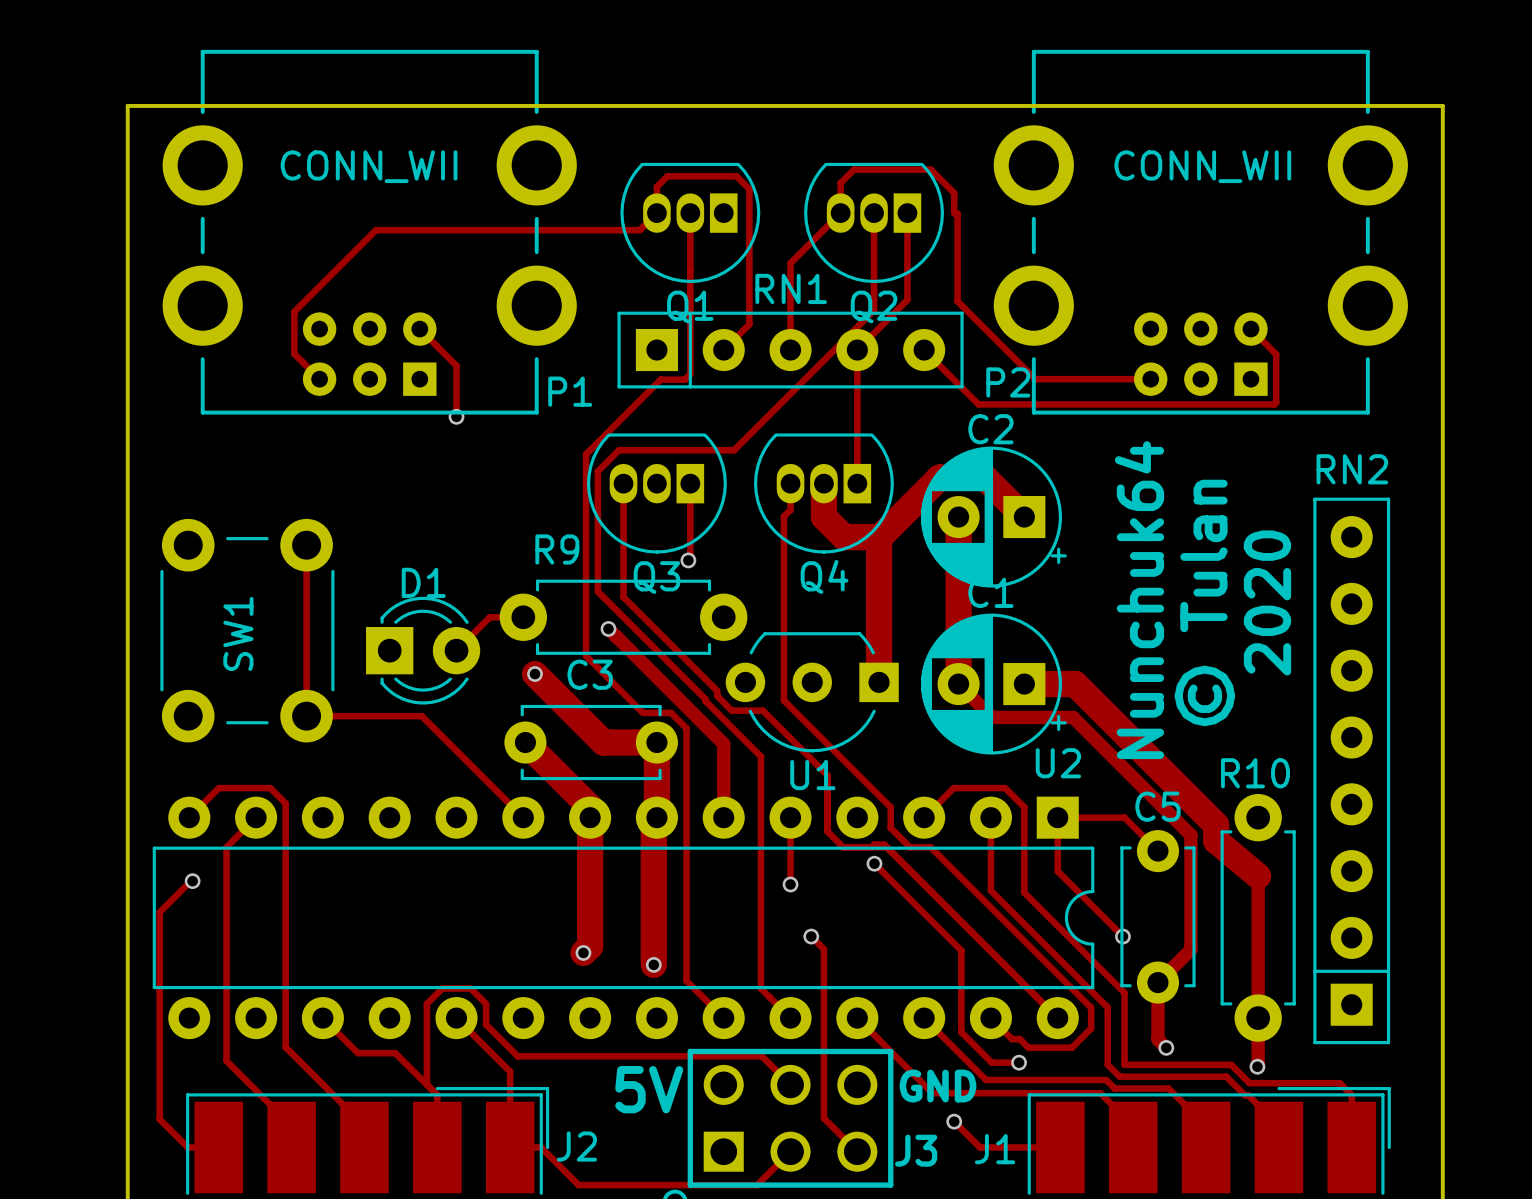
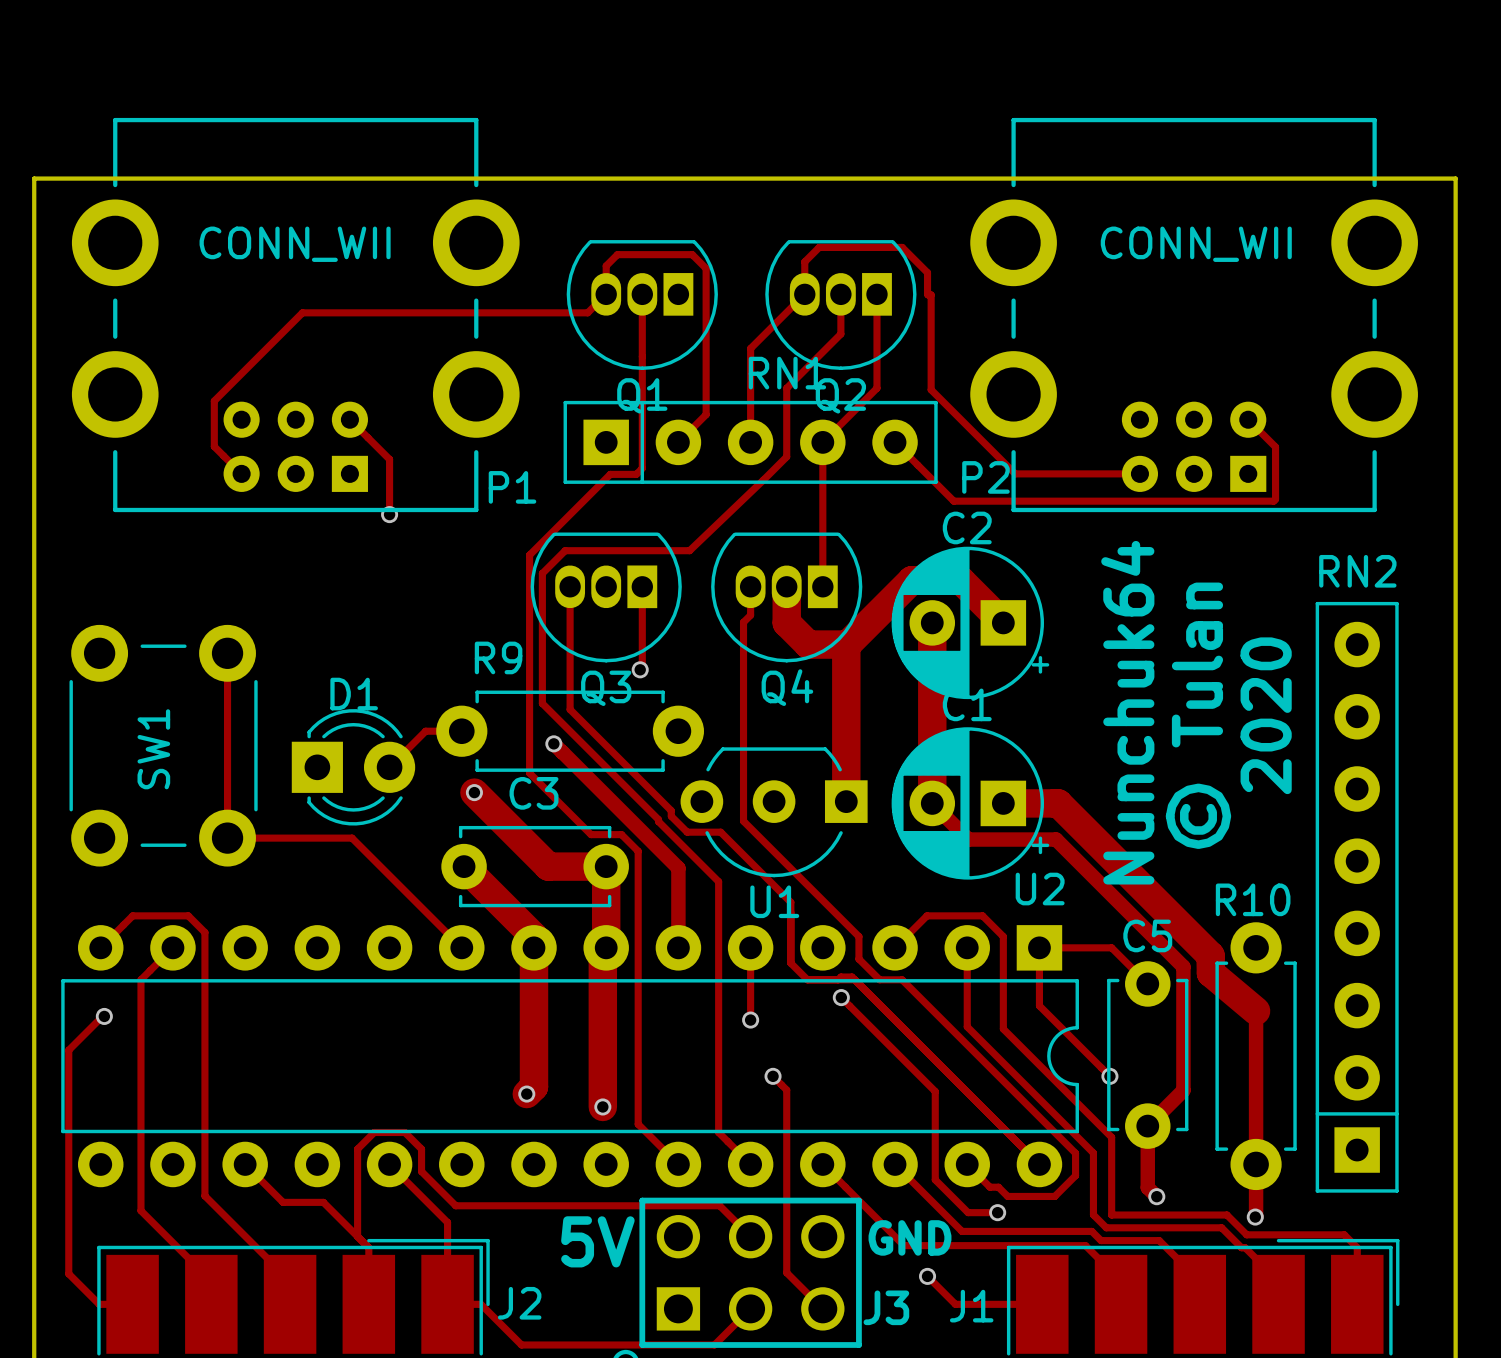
track: (874, 249) (874, 310) (734, 450) -> (840, 334) (786, 388) (786, 456) (689, 550)
RN1 name position: RN1 (791, 288) -> RN1 (787, 373)

